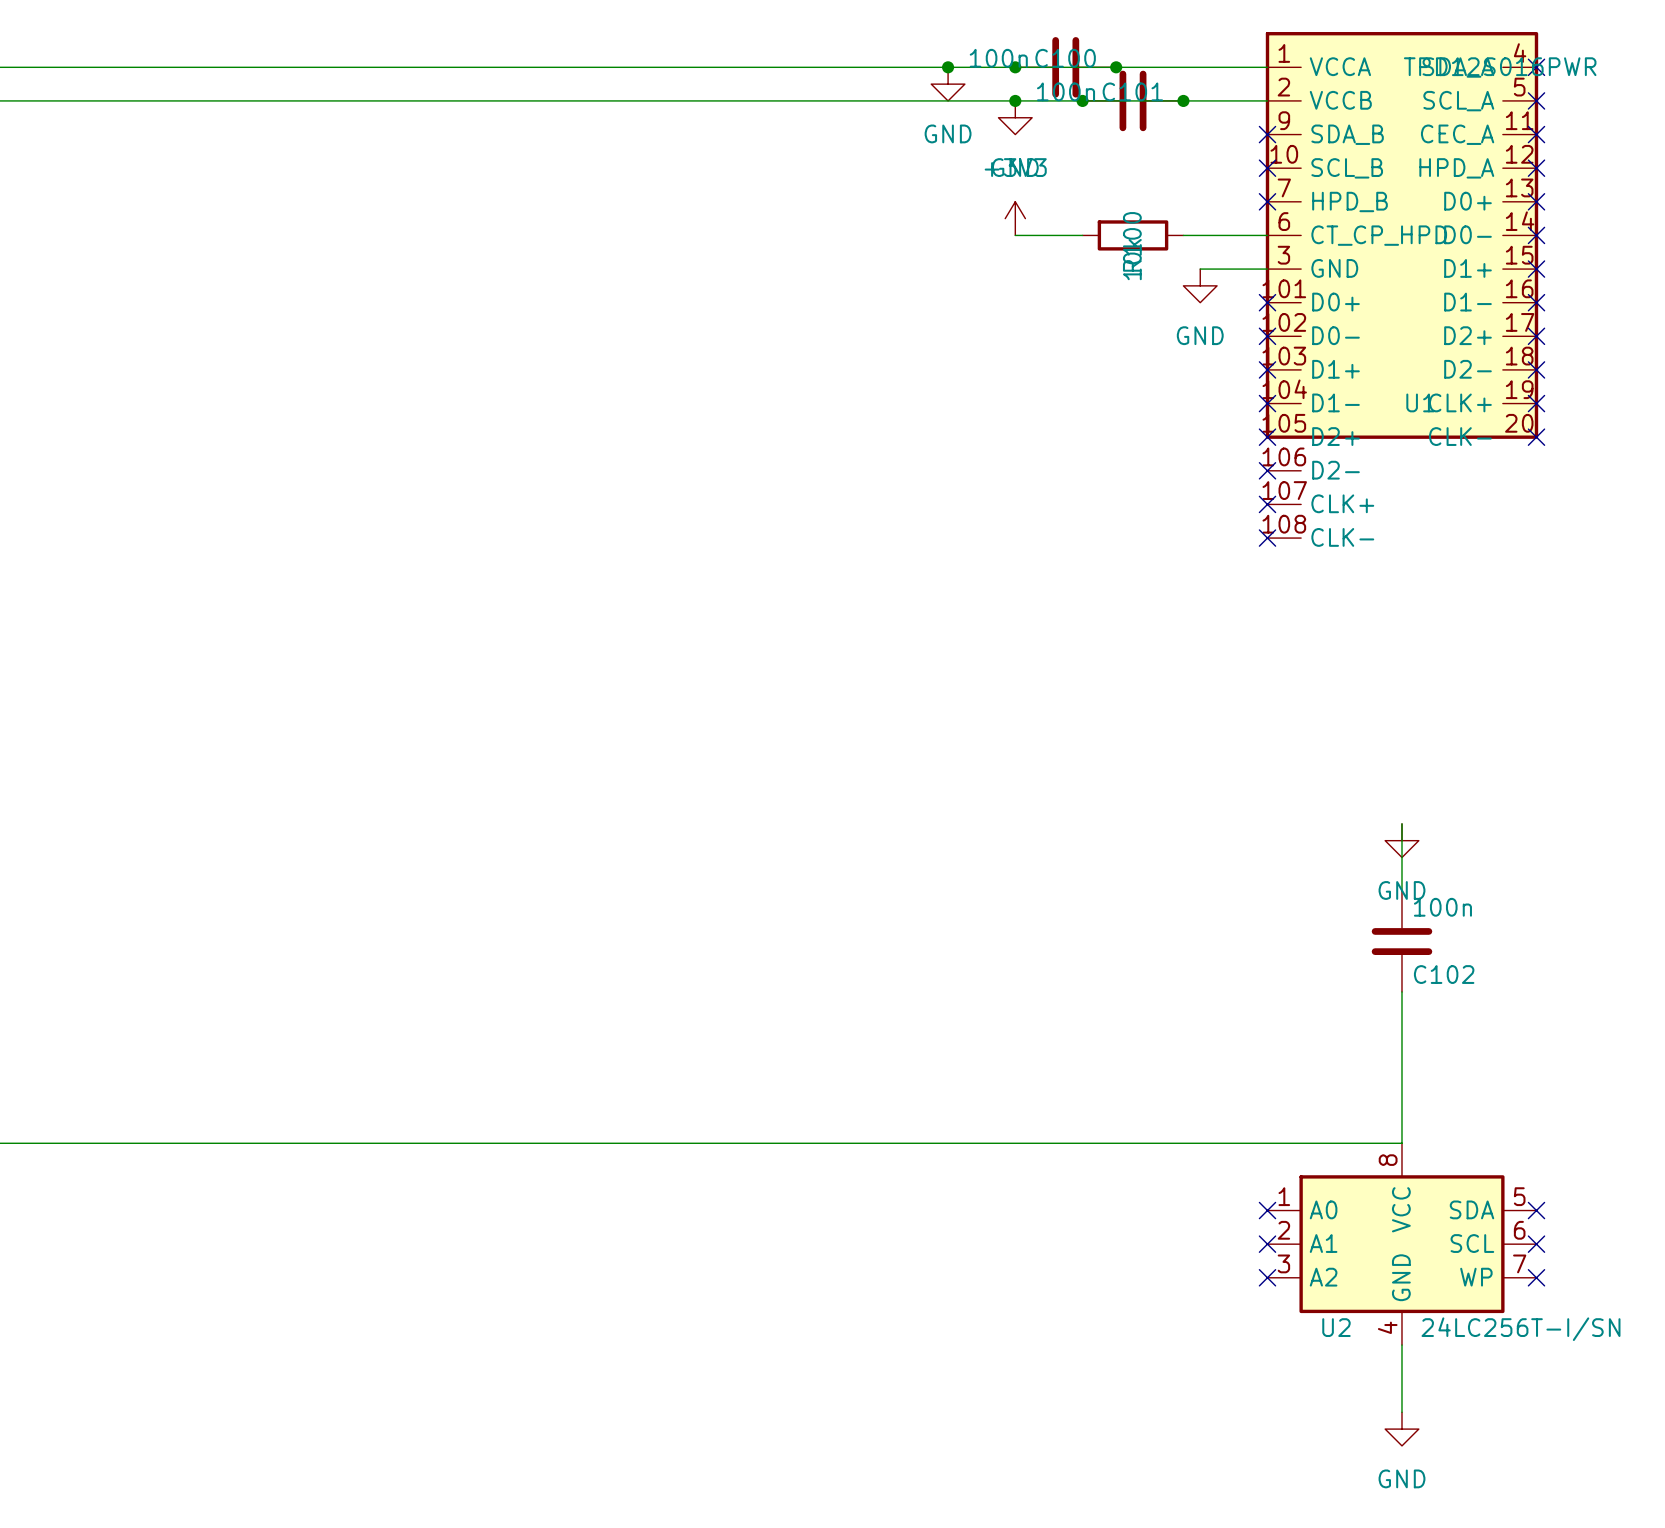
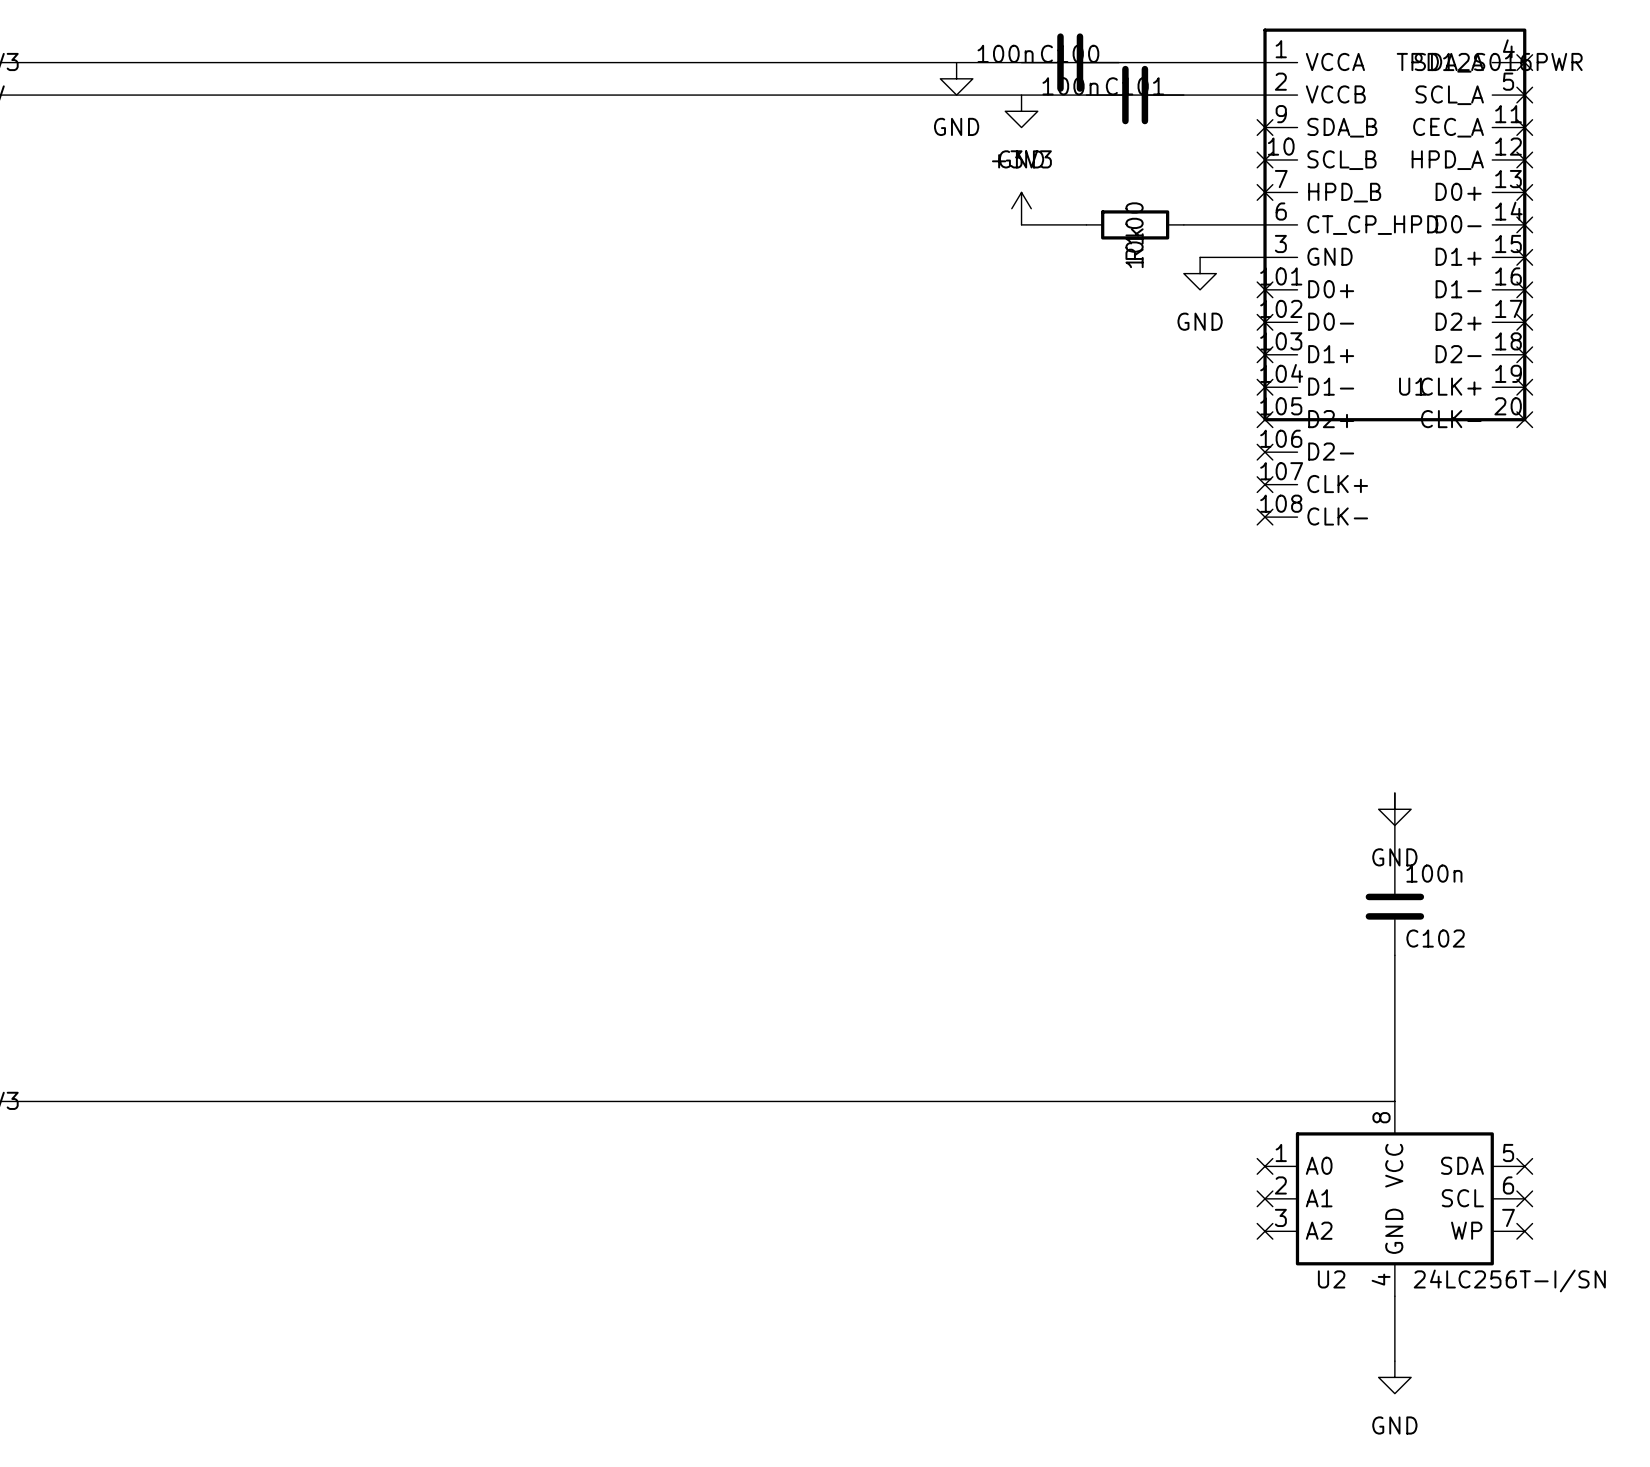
junction: (948, 67) -> none
junction: (1015, 67) -> none
junction: (1116, 67) -> none
junction: (1015, 100) -> none
junction: (1082, 100) -> none
junction: (1183, 100) -> none

